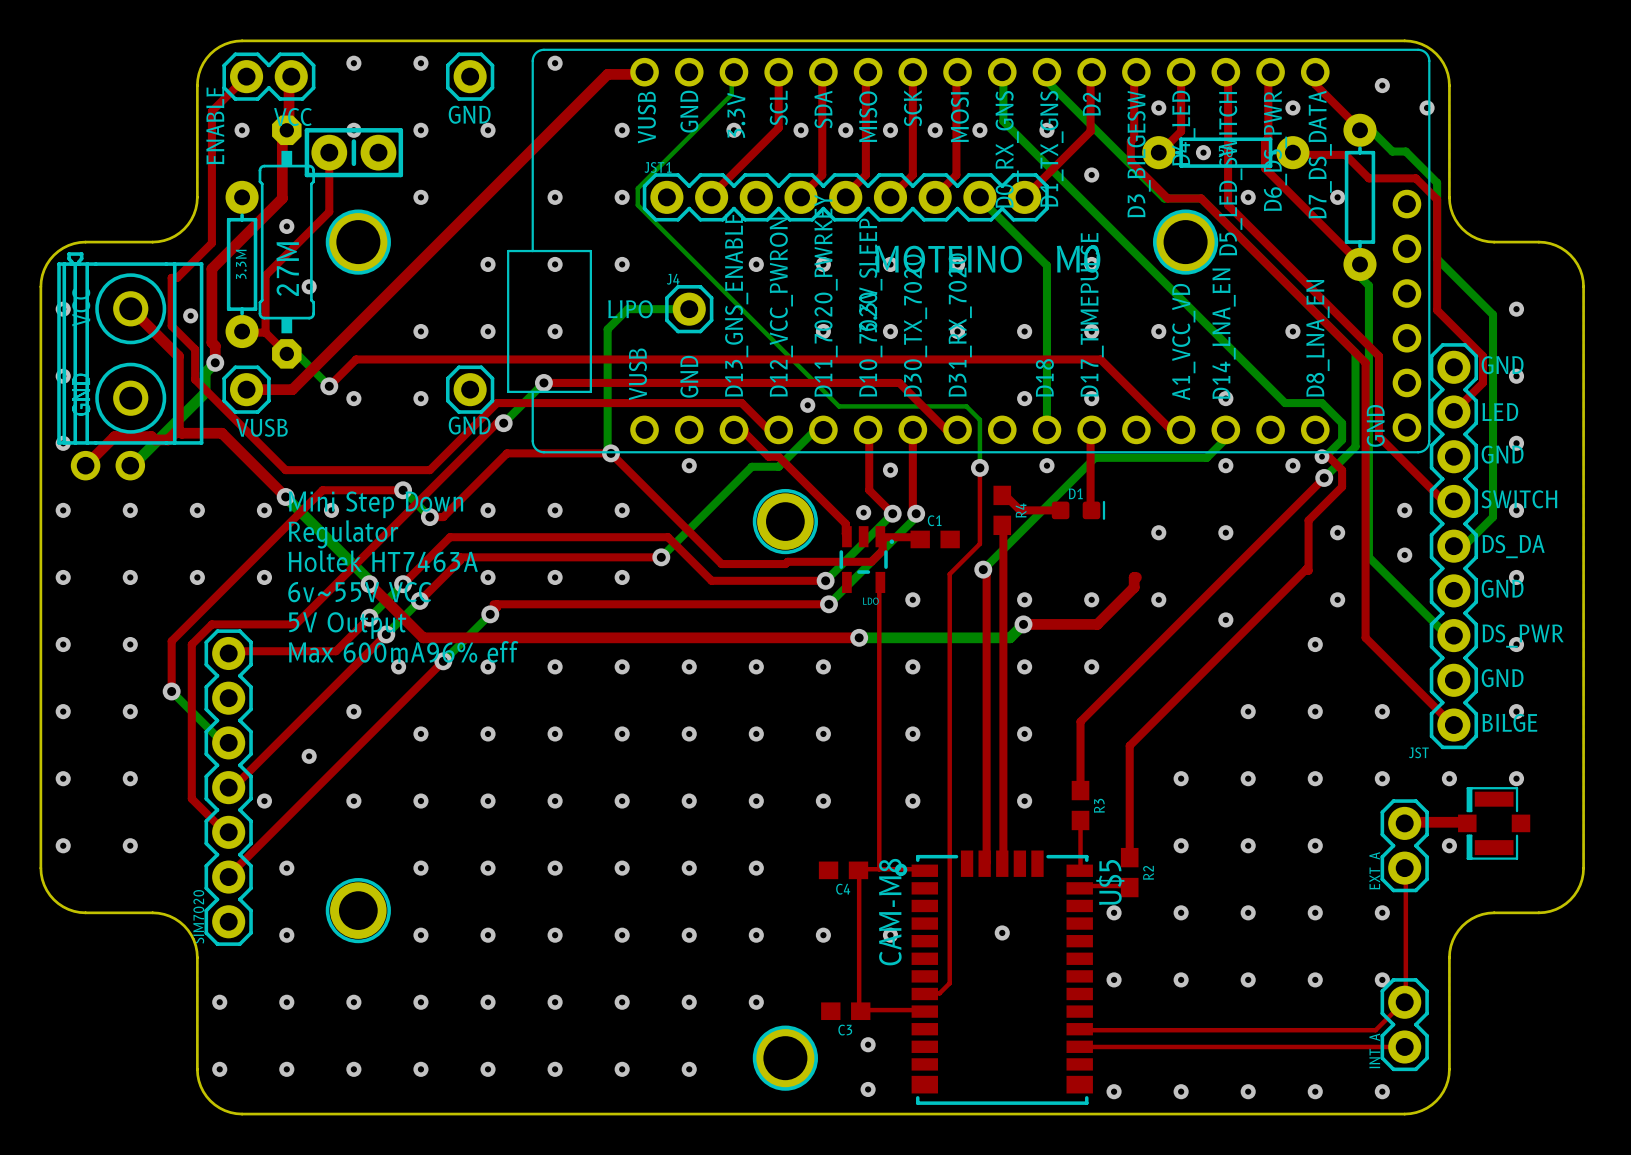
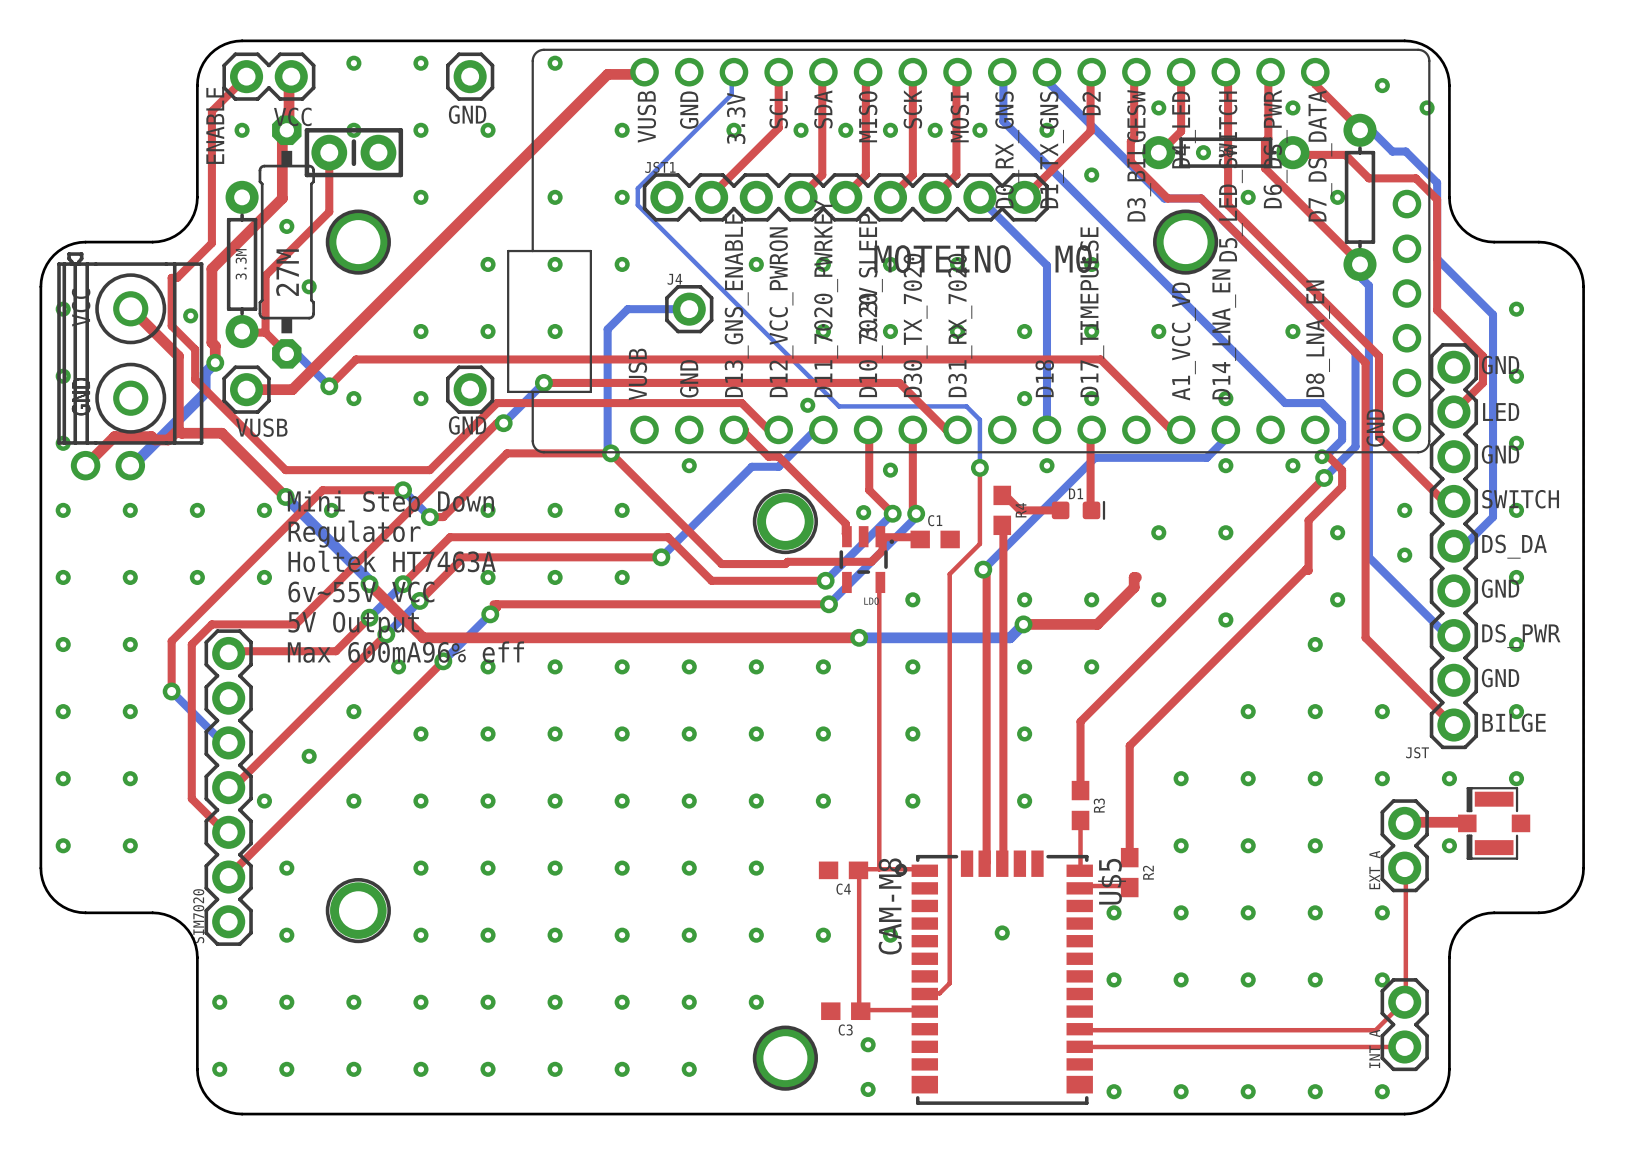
J4 value: LIPO (630, 309) -> none

